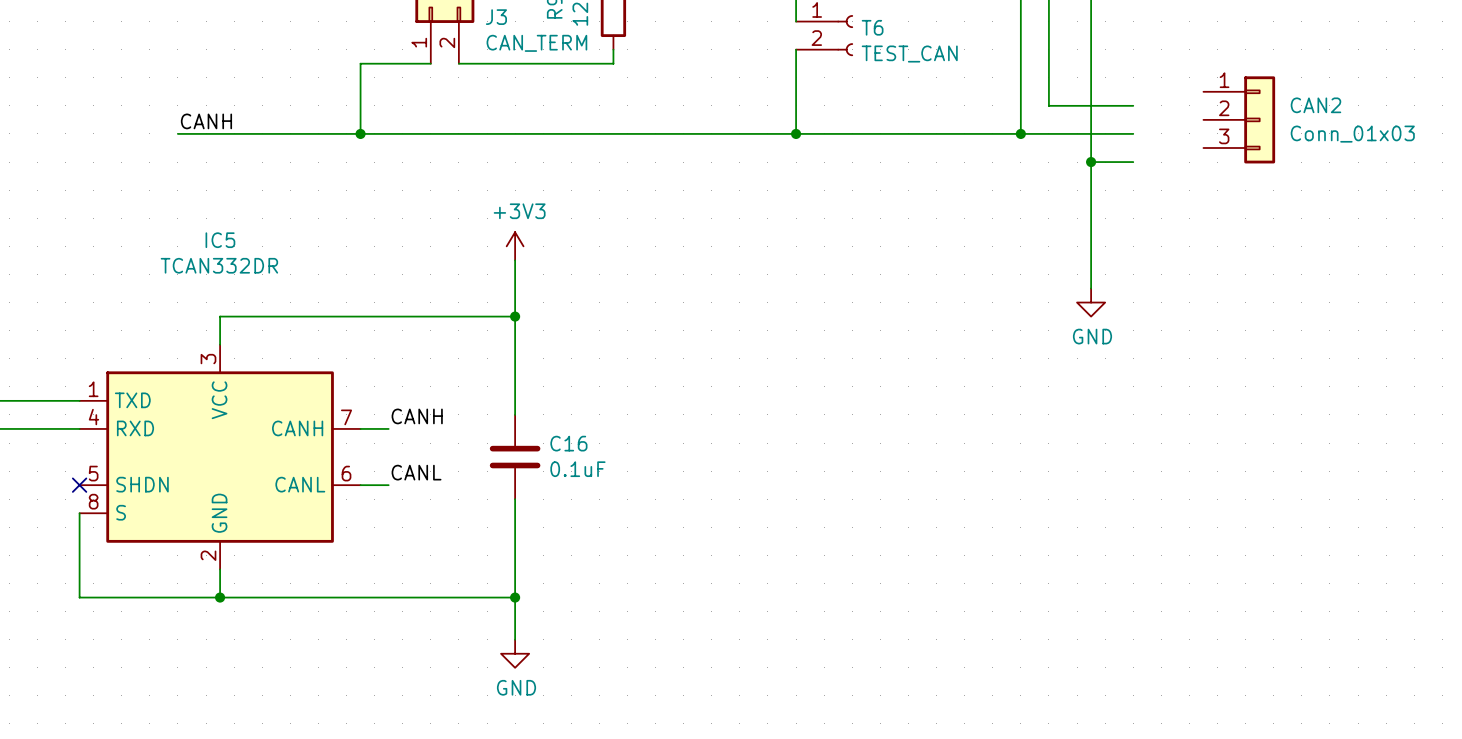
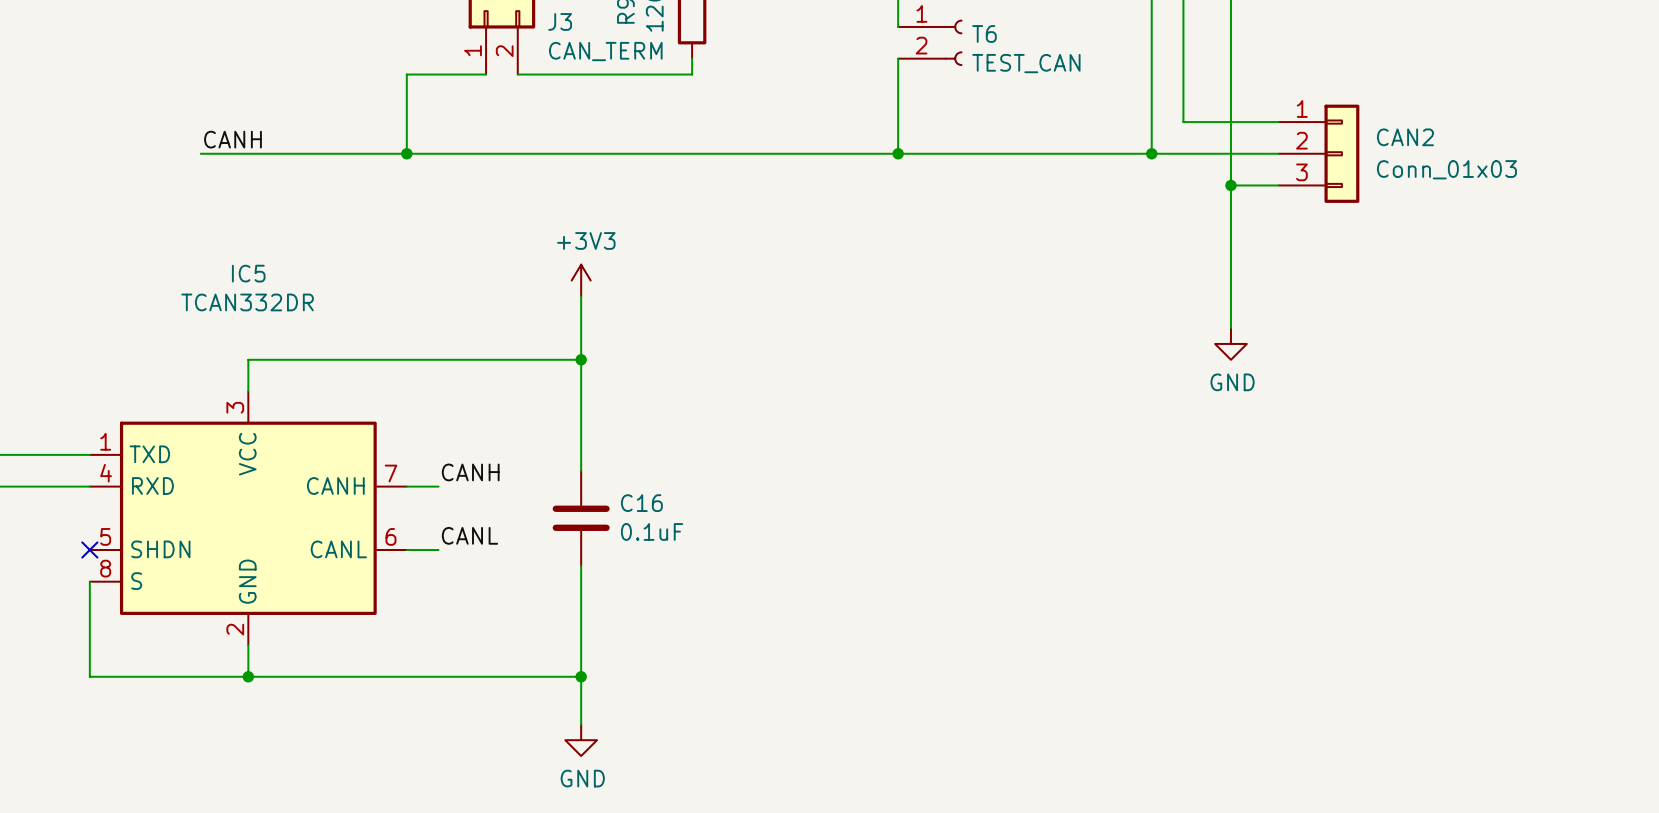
CAN2 position: (1239, 119) -> (1318, 153)

